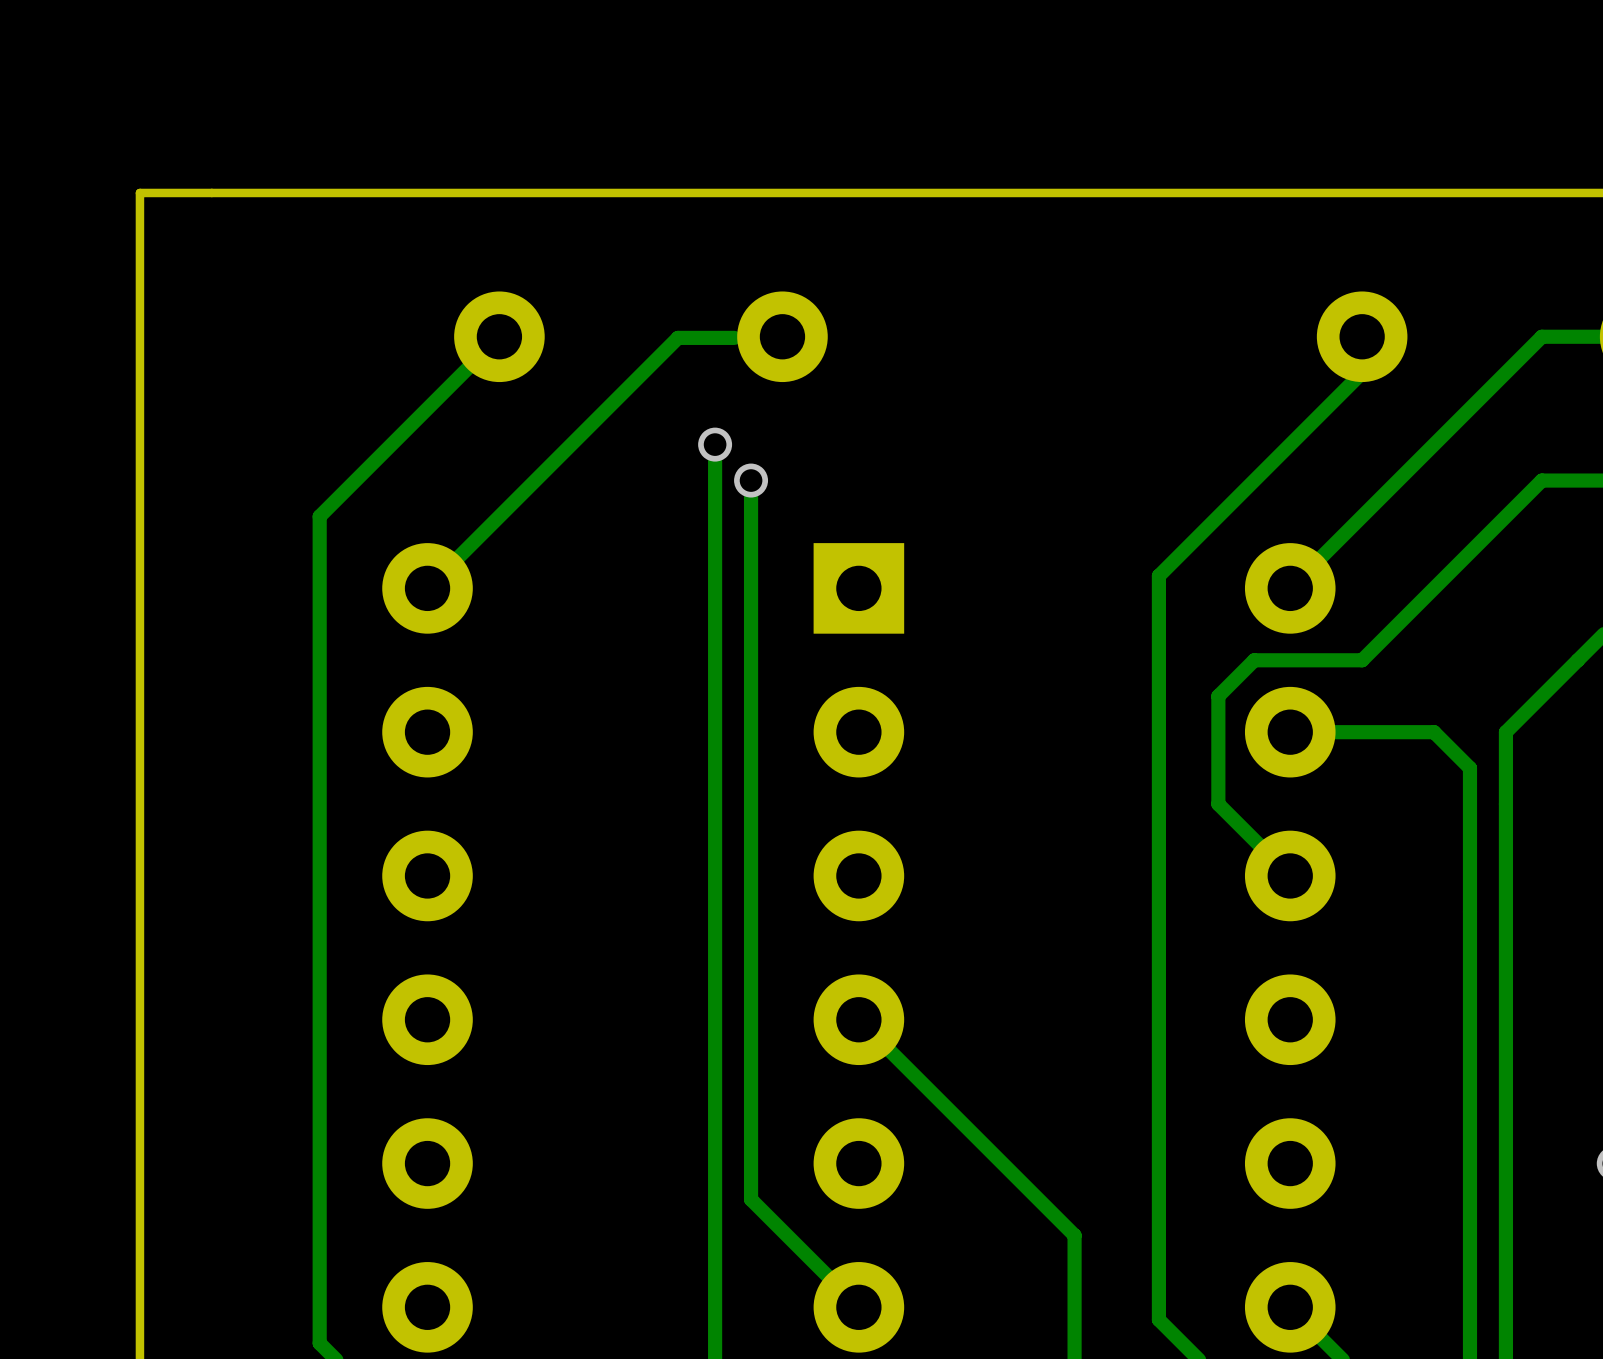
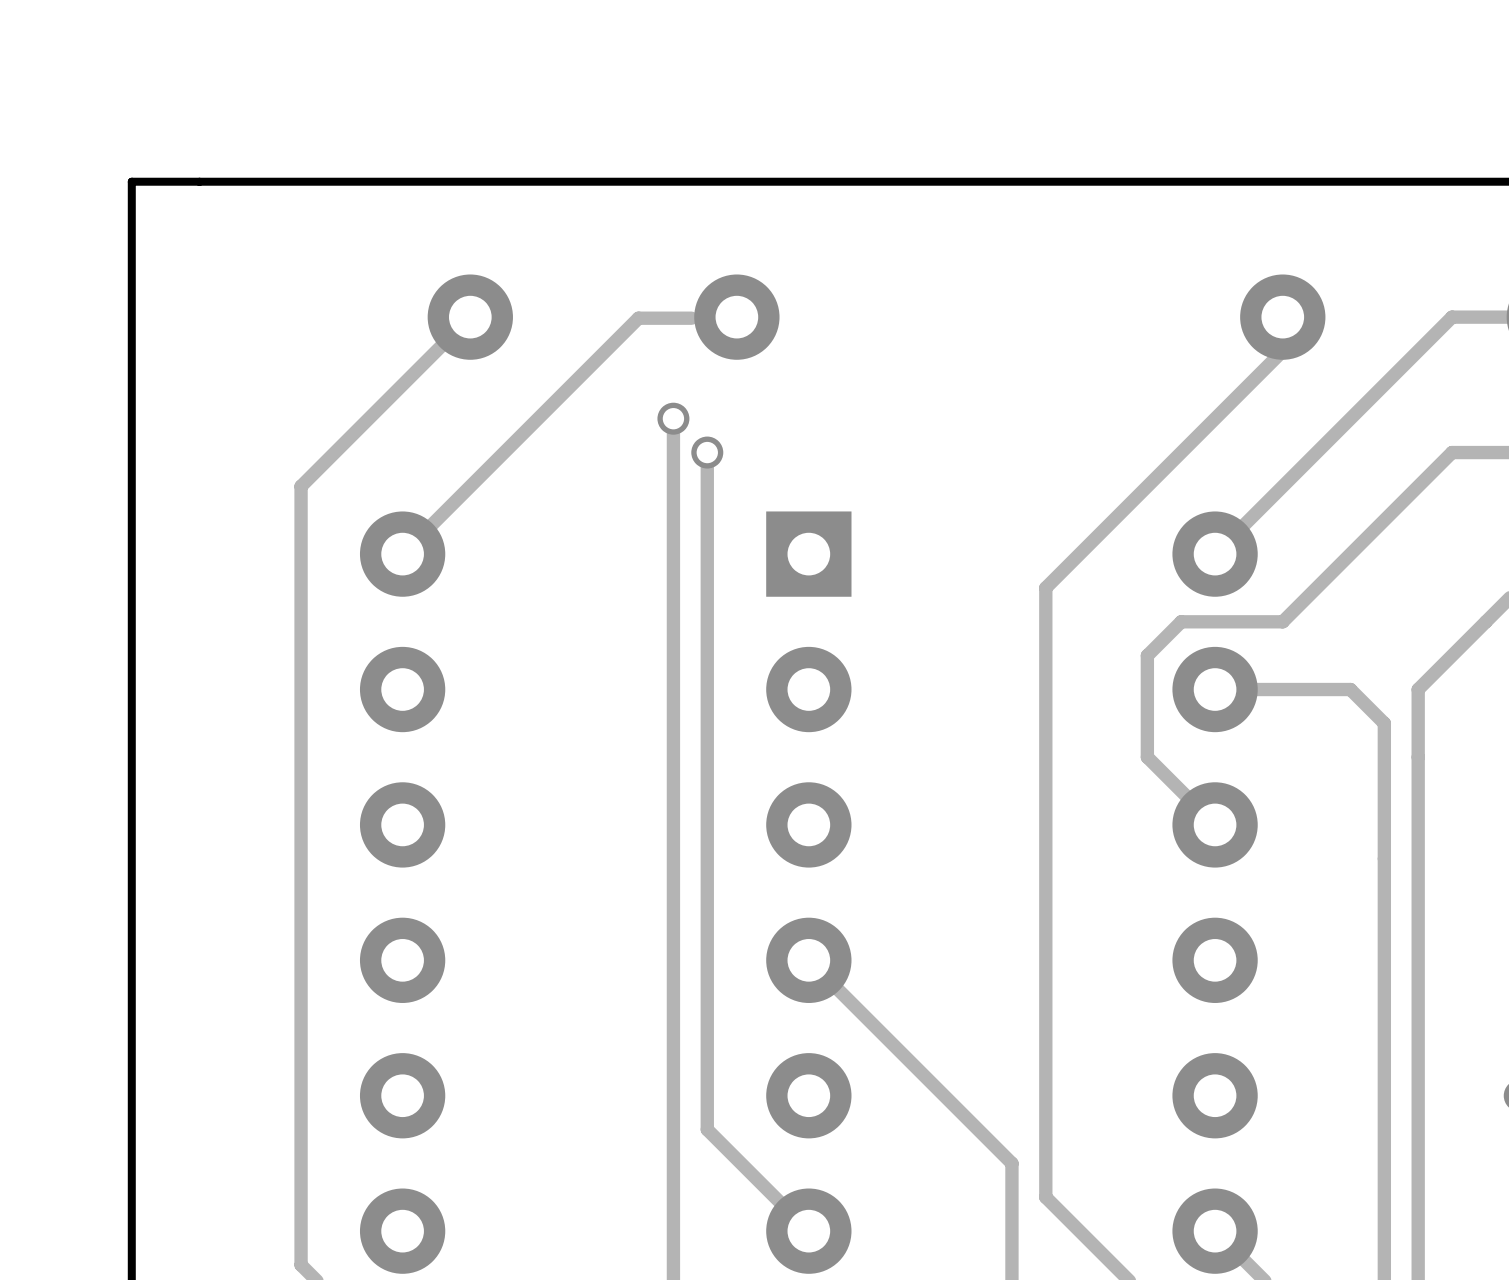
track: (1158, 575) (1158, 1319) -> (1091, 542) (1045, 587) (1045, 1197) (1091, 1242)

